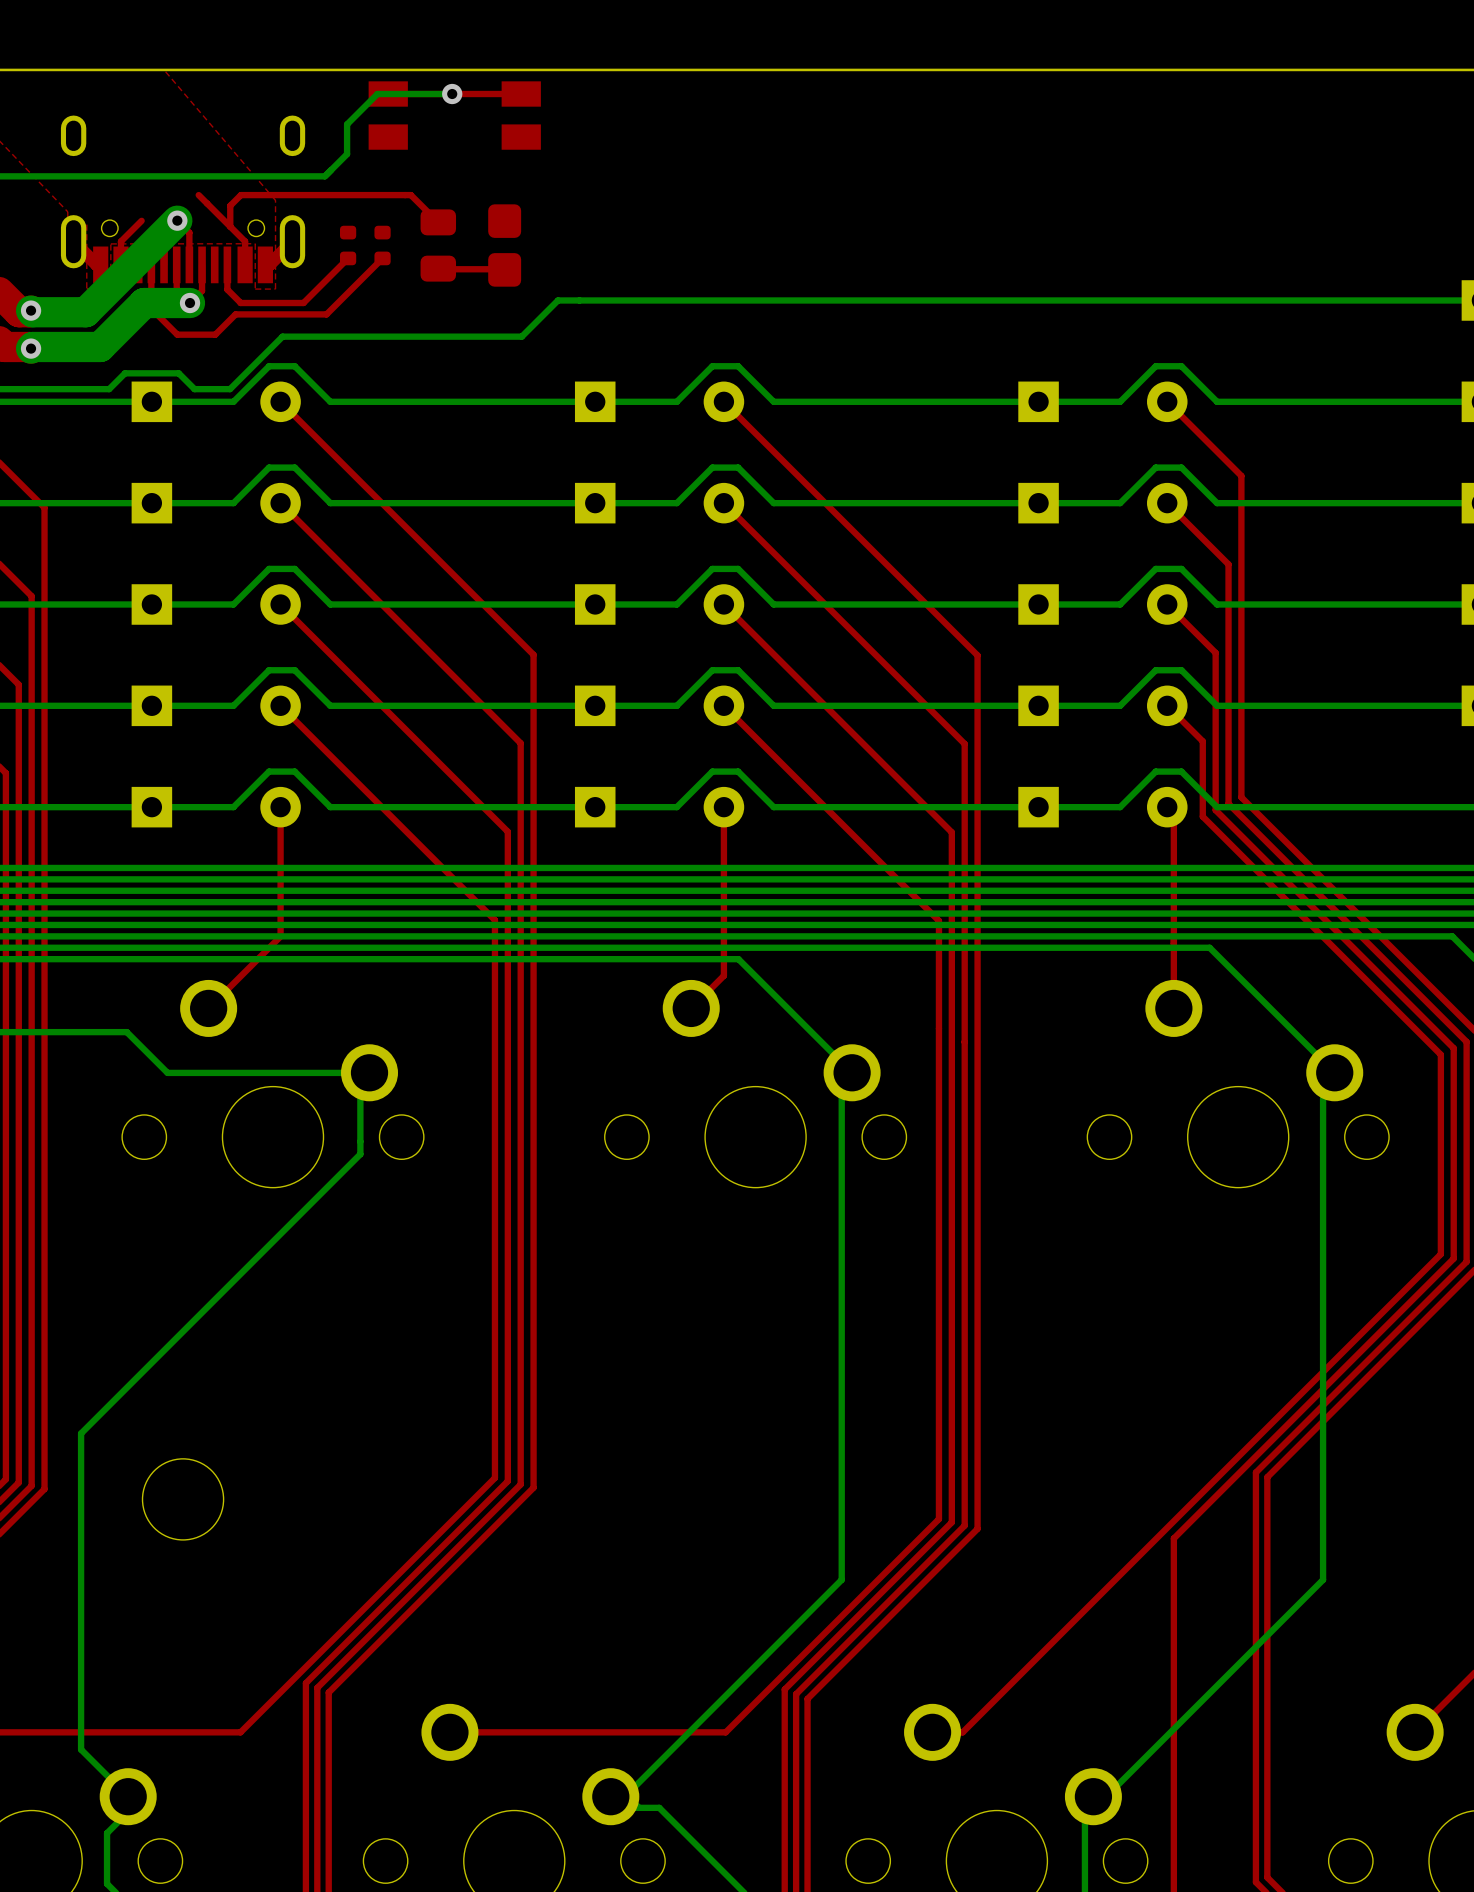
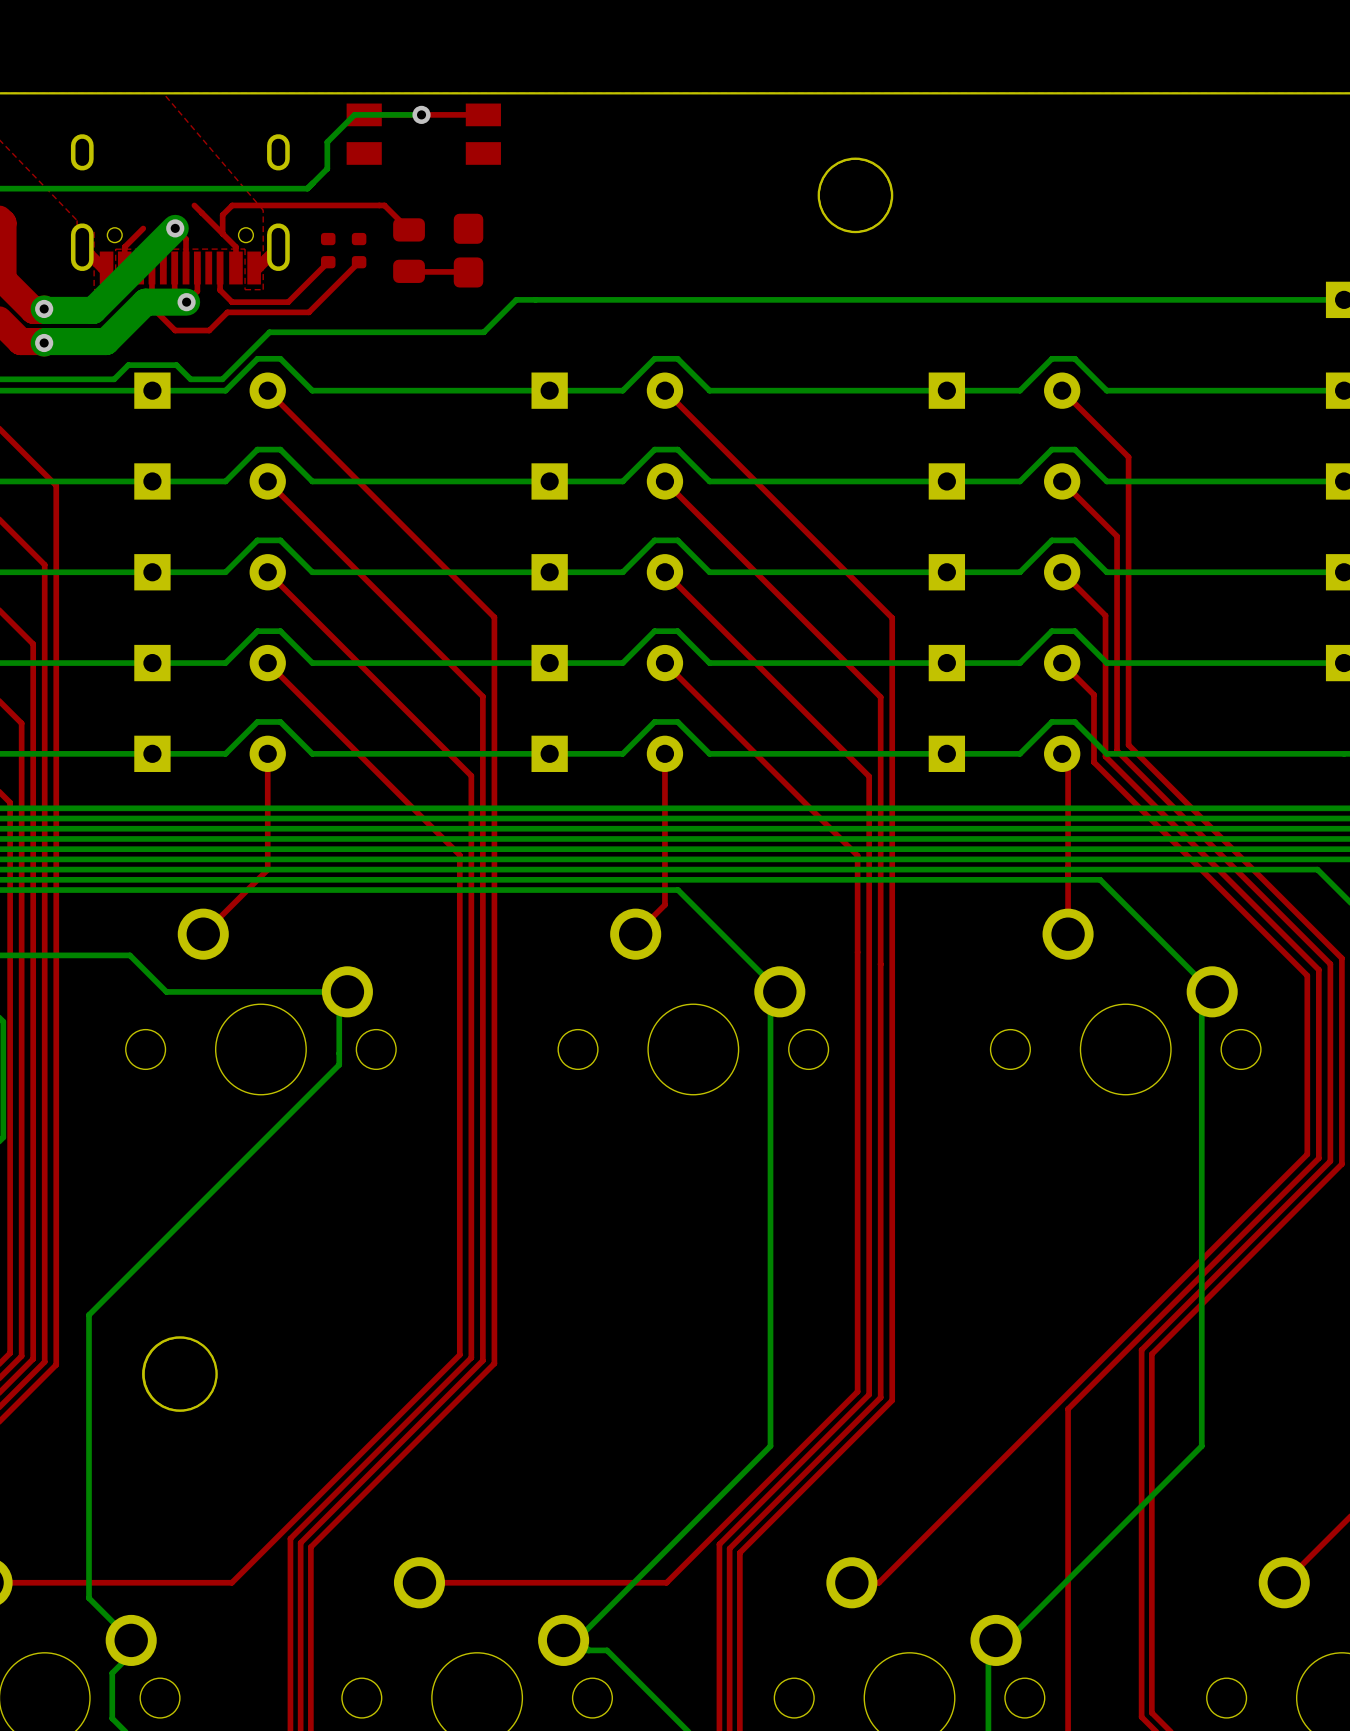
round board edge: none -> [817, 157, 894, 234]
round board edge: none -> [142, 1336, 218, 1412]

